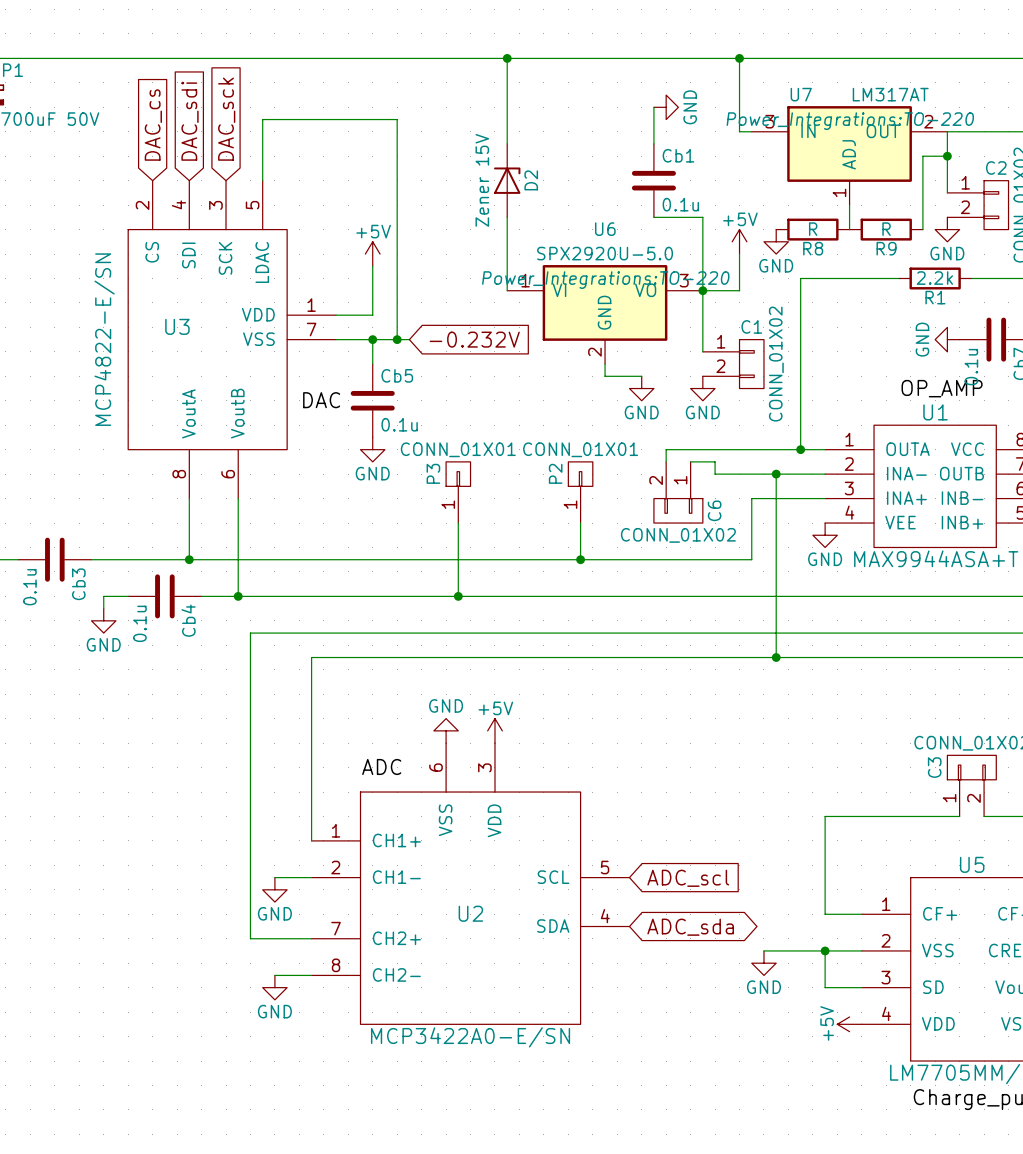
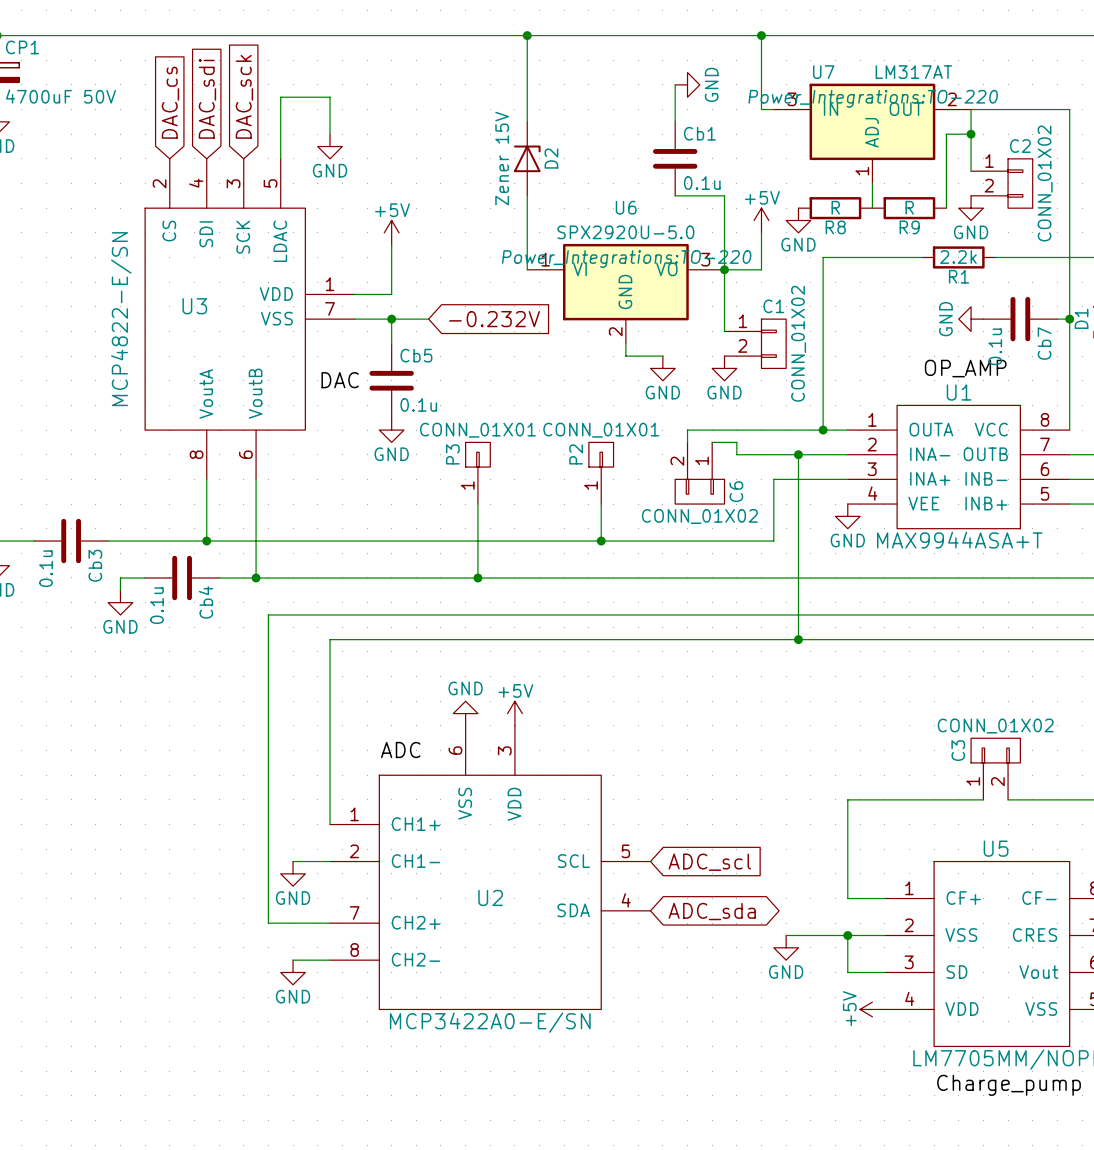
wire: (311, 119) (397, 119) (397, 339) -> (330, 97) (330, 134)
power symbol: none -> GND (330, 146)
junction: (397, 339) -> none

